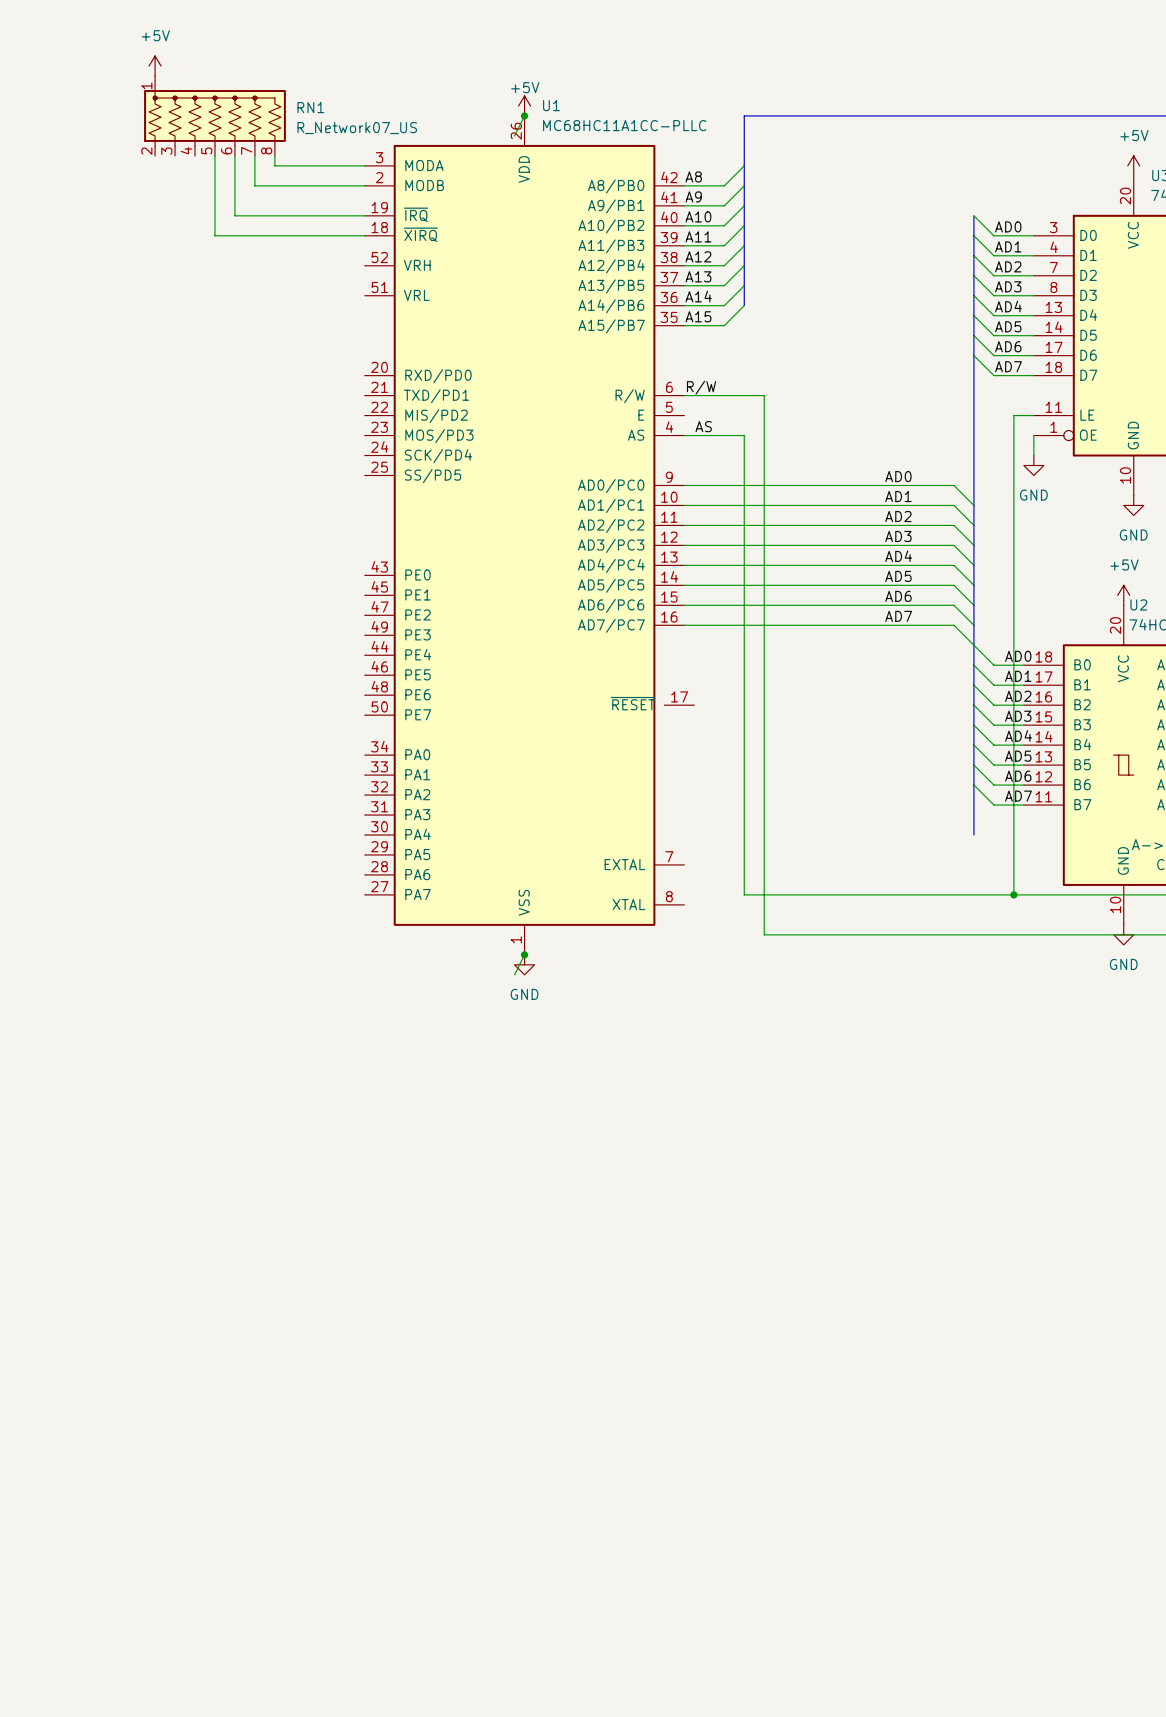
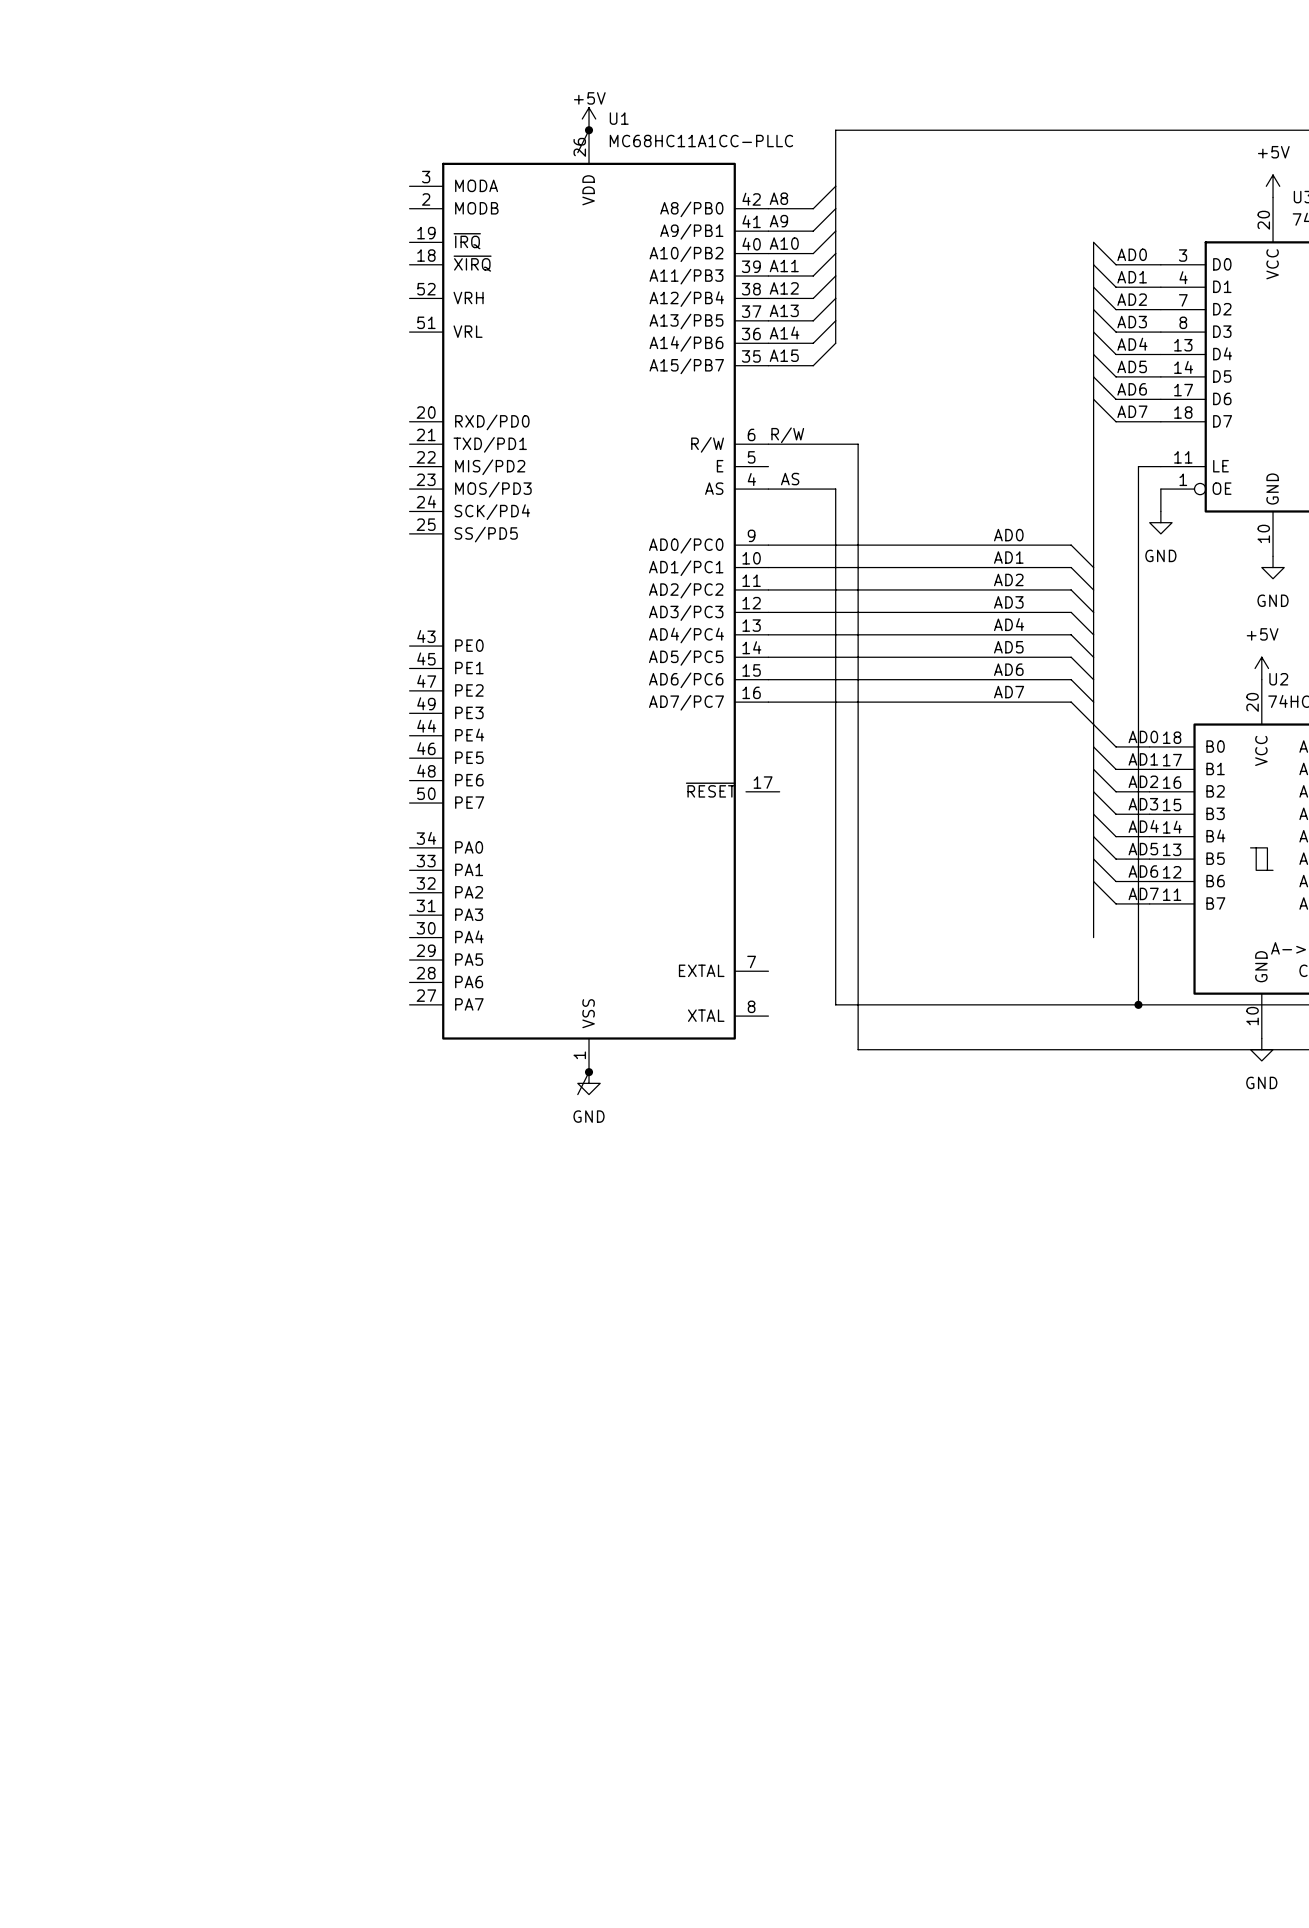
power symbol: +5V (155, 66) -> none
RN1: R_Network07_US (214, 115) -> none
wire: (214, 155) (214, 235) (364, 235) -> none
wire: (234, 155) (234, 215) (364, 215) -> none
wire: (254, 155) (254, 185) (364, 185) -> none
wire: (274, 155) (274, 165) (364, 165) -> none

